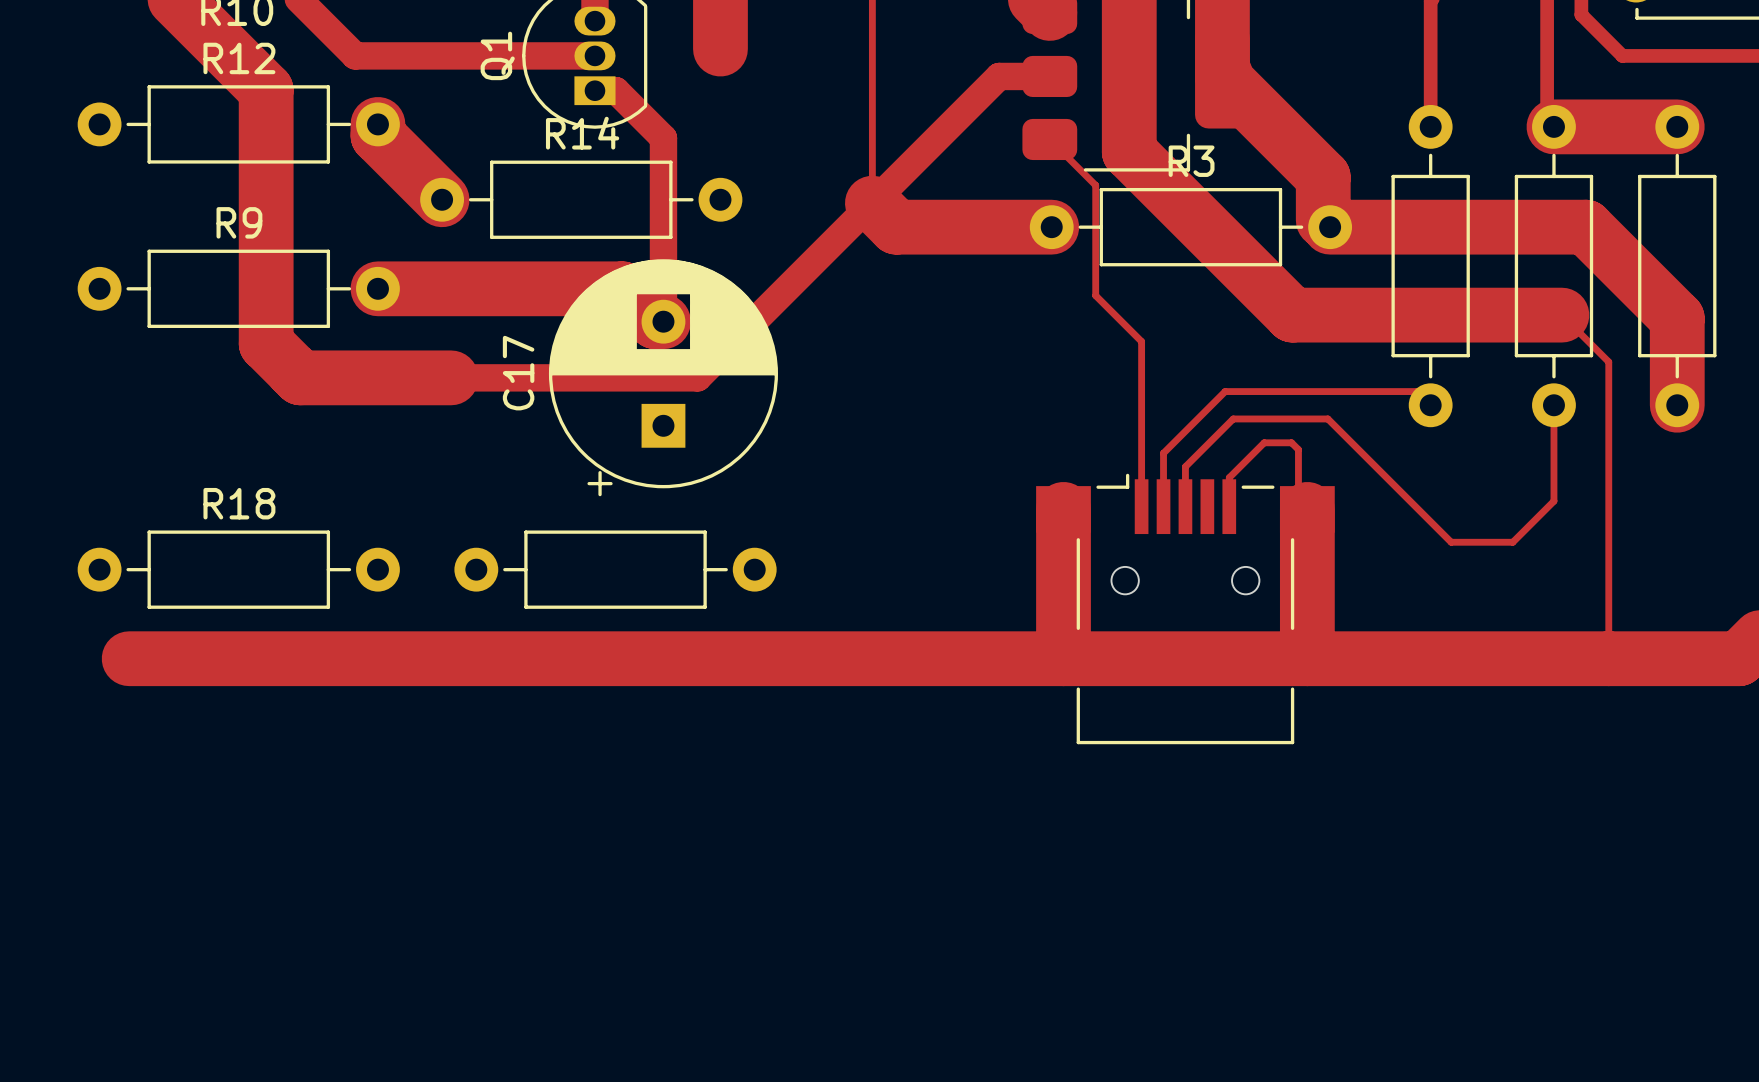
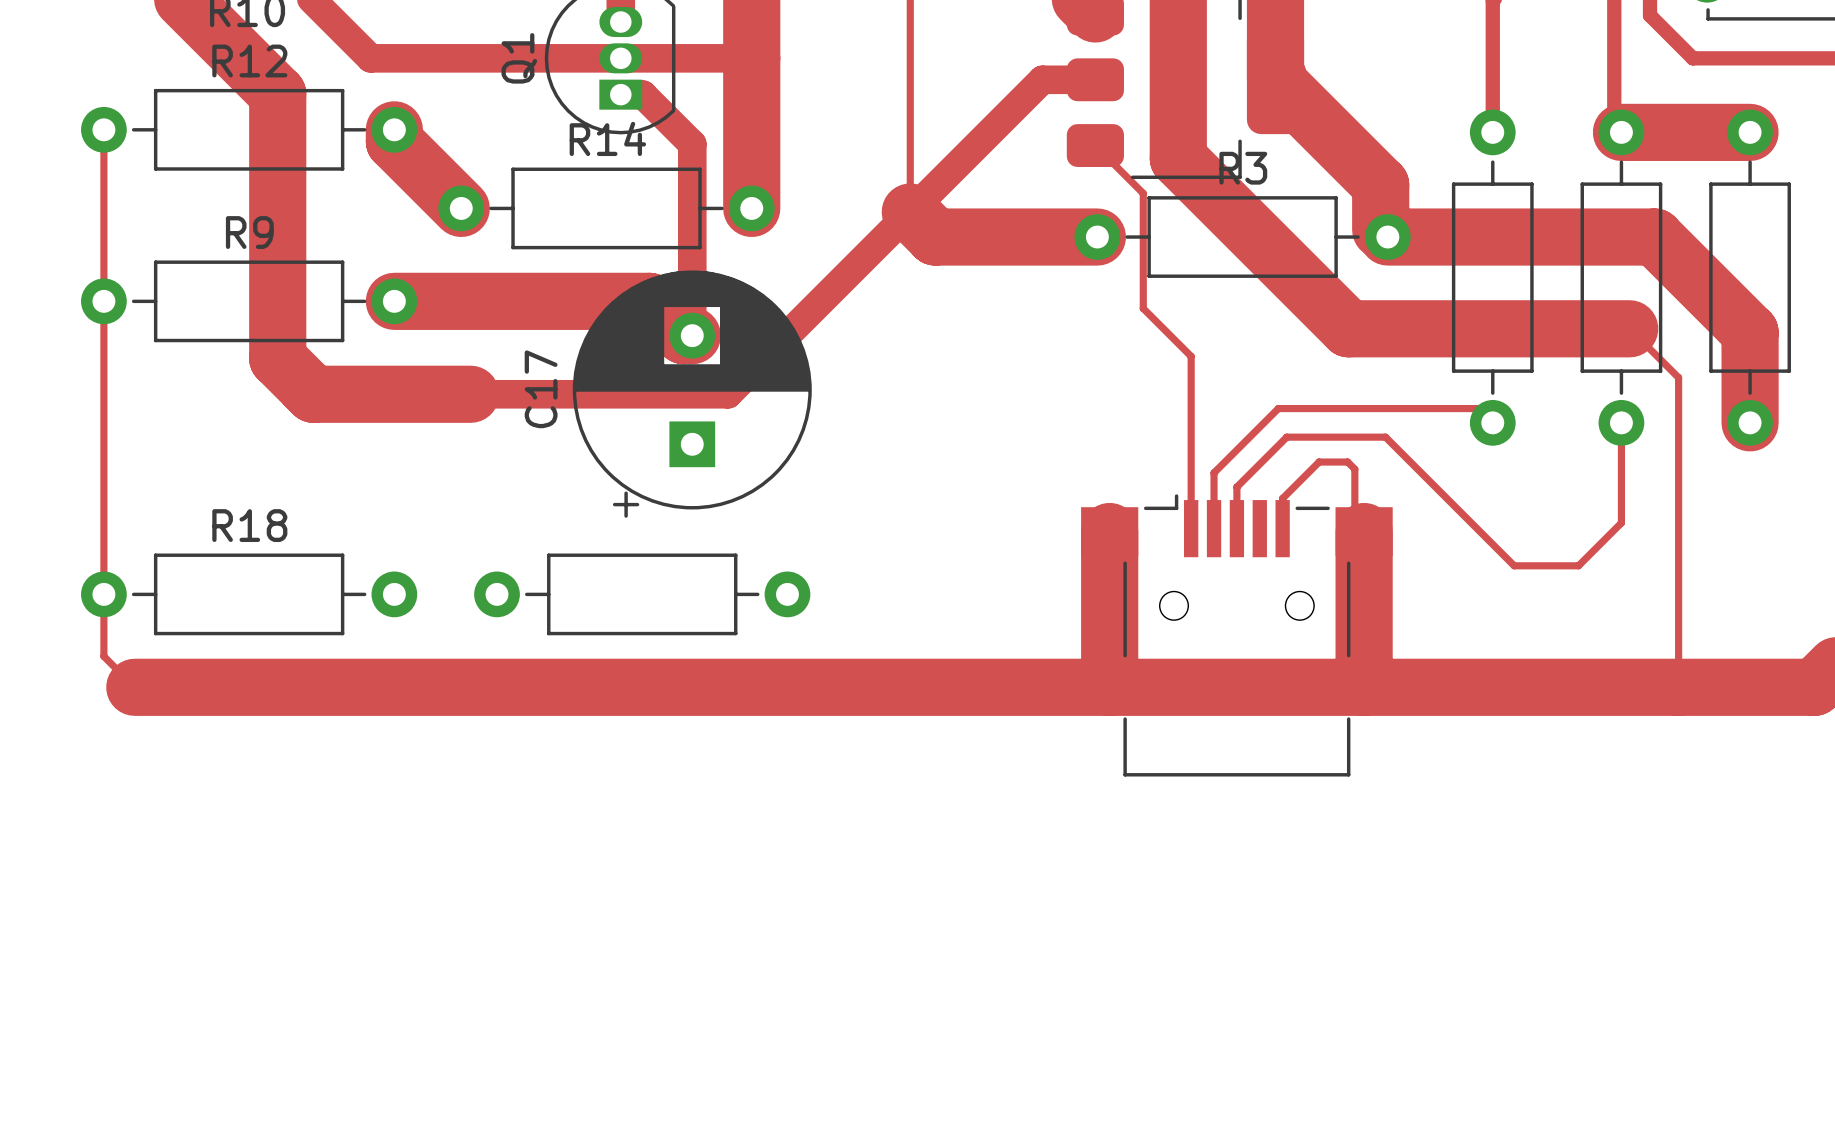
track: none -> (751, 51) (751, 208)
track: none -> (620, 58) (751, 58)
track: none -> (103, 129) (103, 656) (134, 687)

